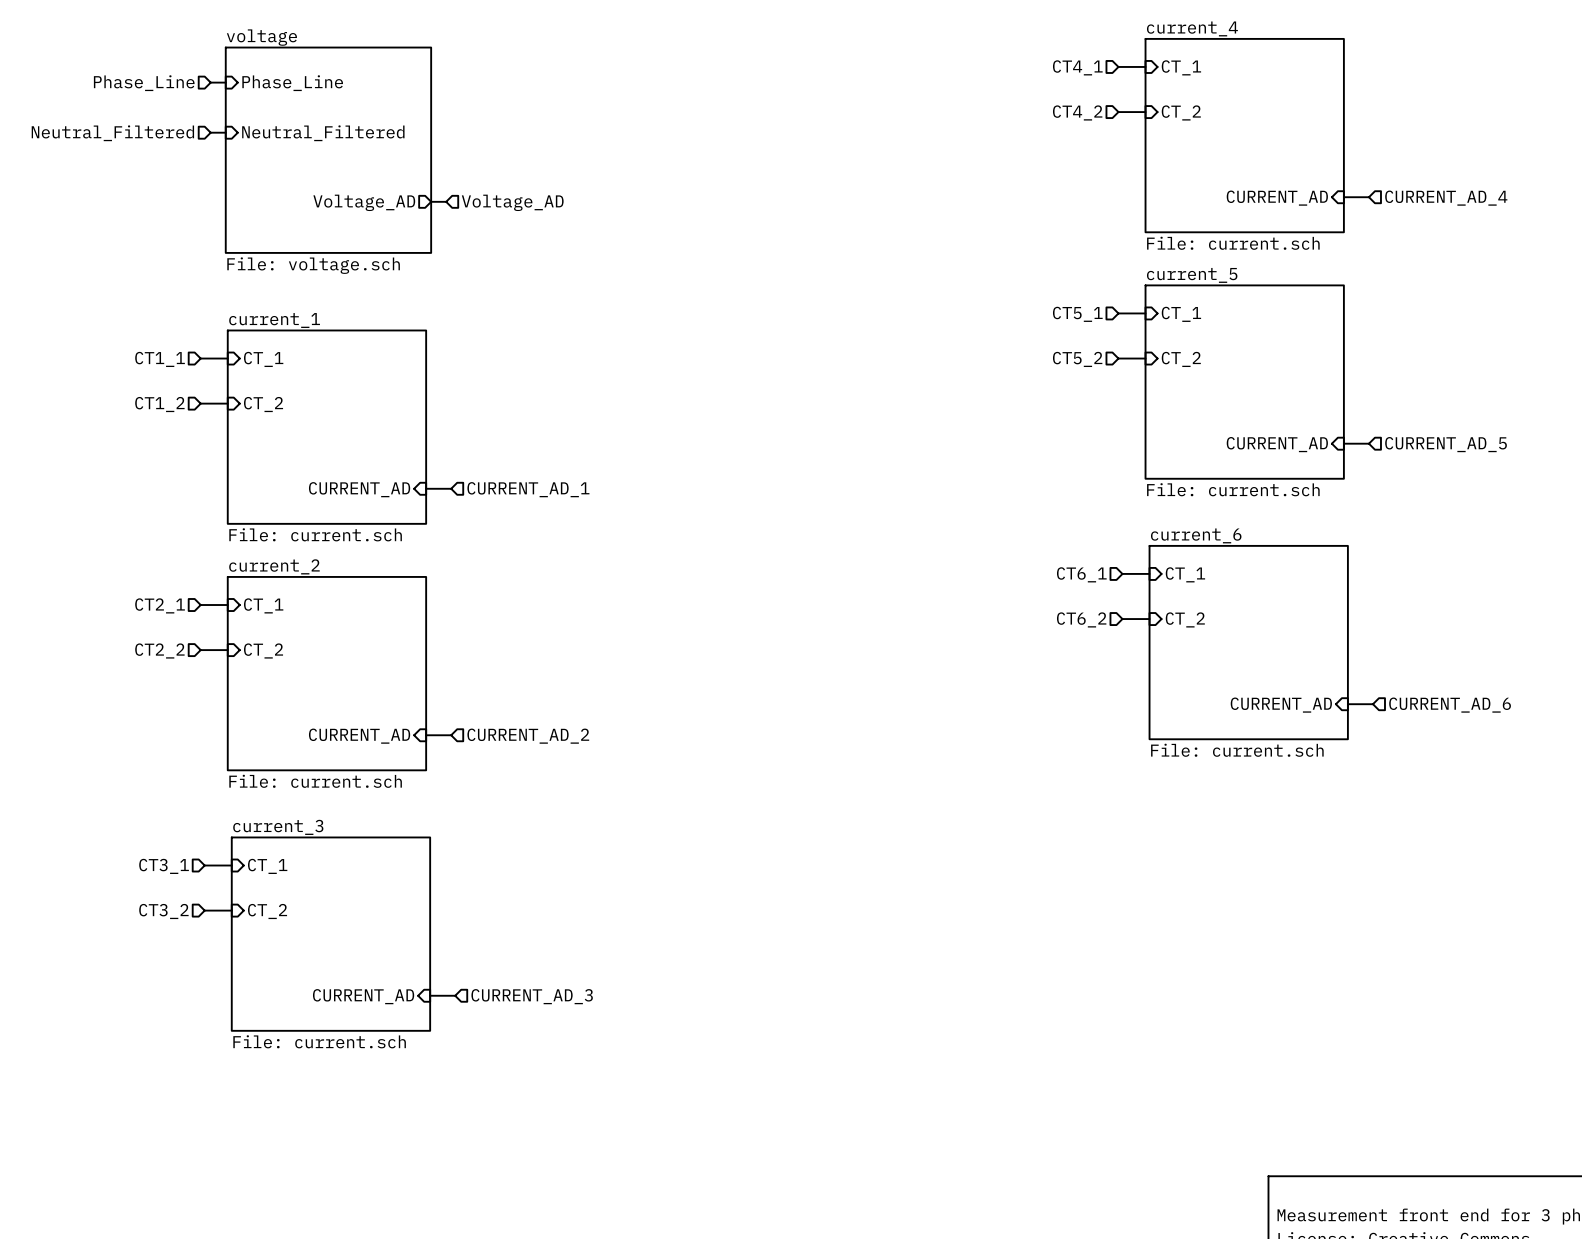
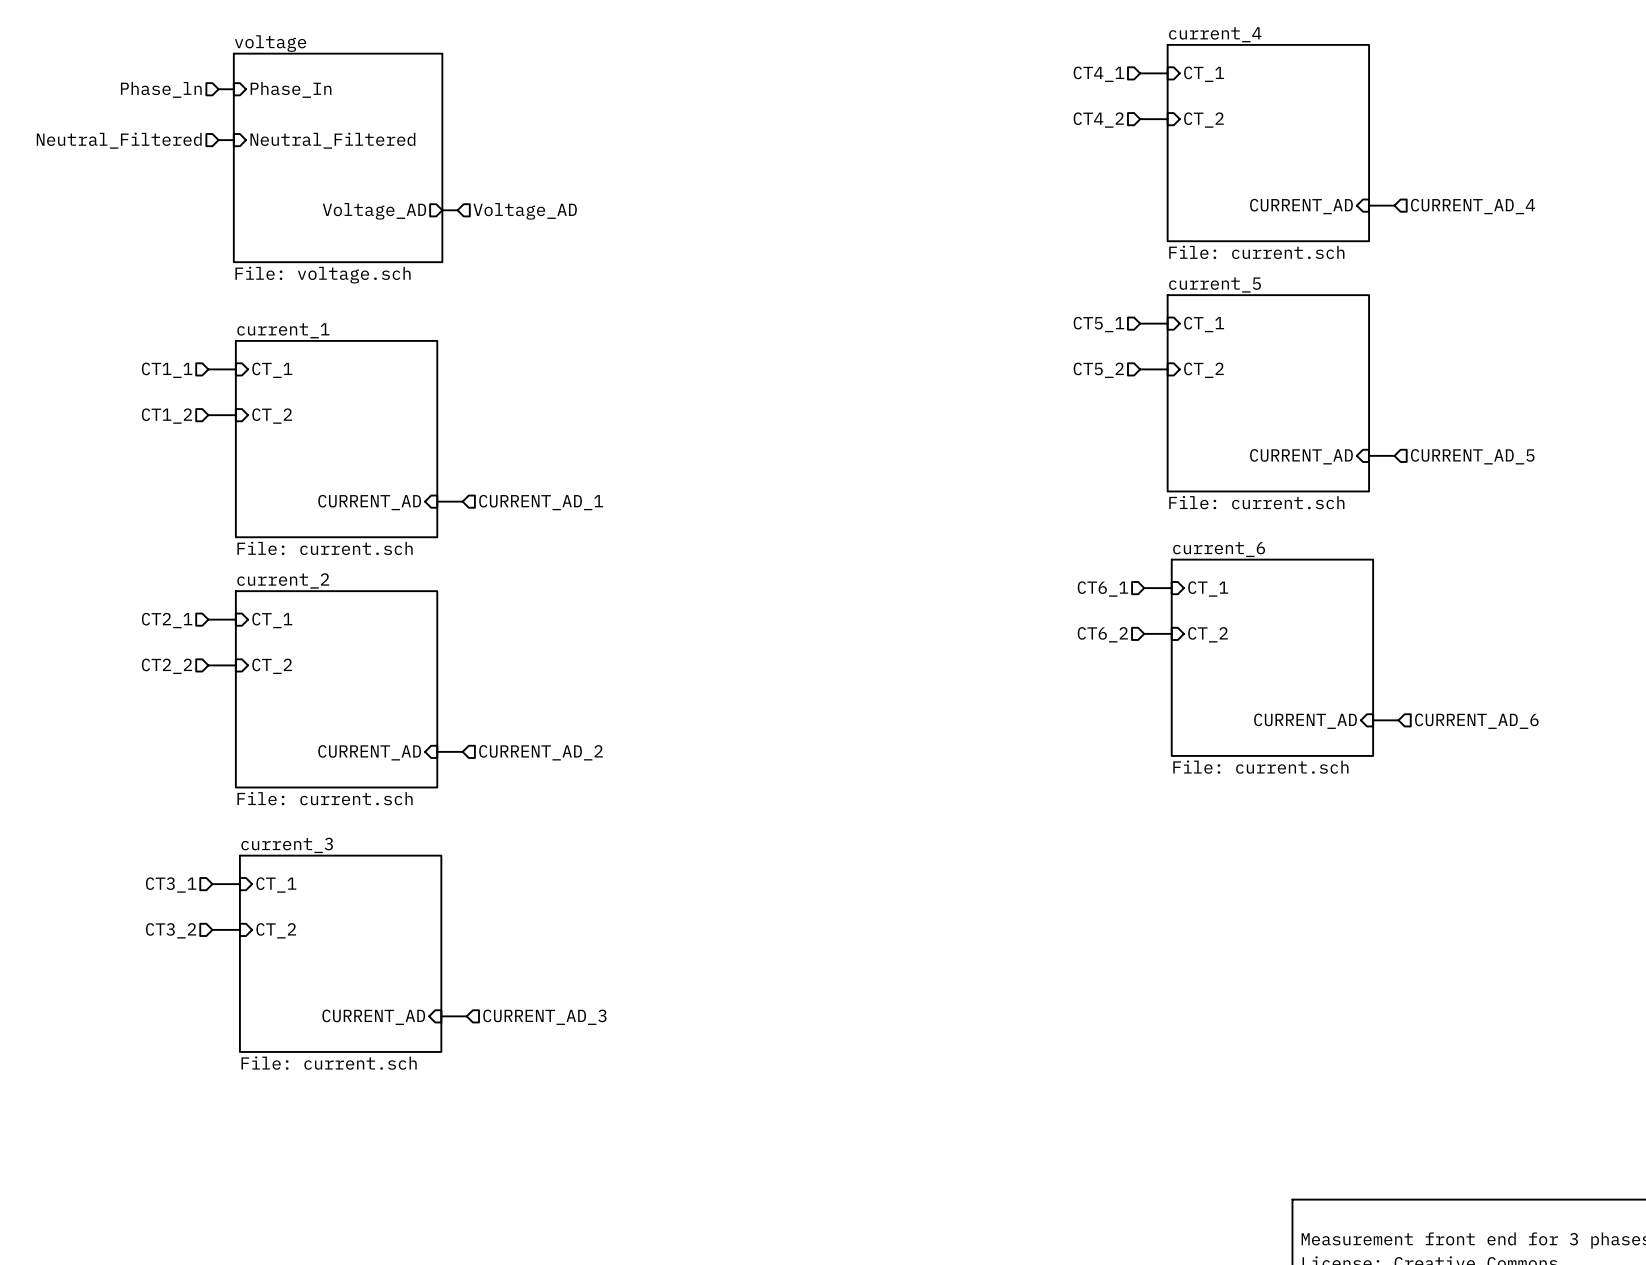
hierarchical label: Phase_Line (144, 83) -> Phase_ln (161, 89)
sheet pin: Phase_Line (292, 83) -> Phase_In (291, 89)

